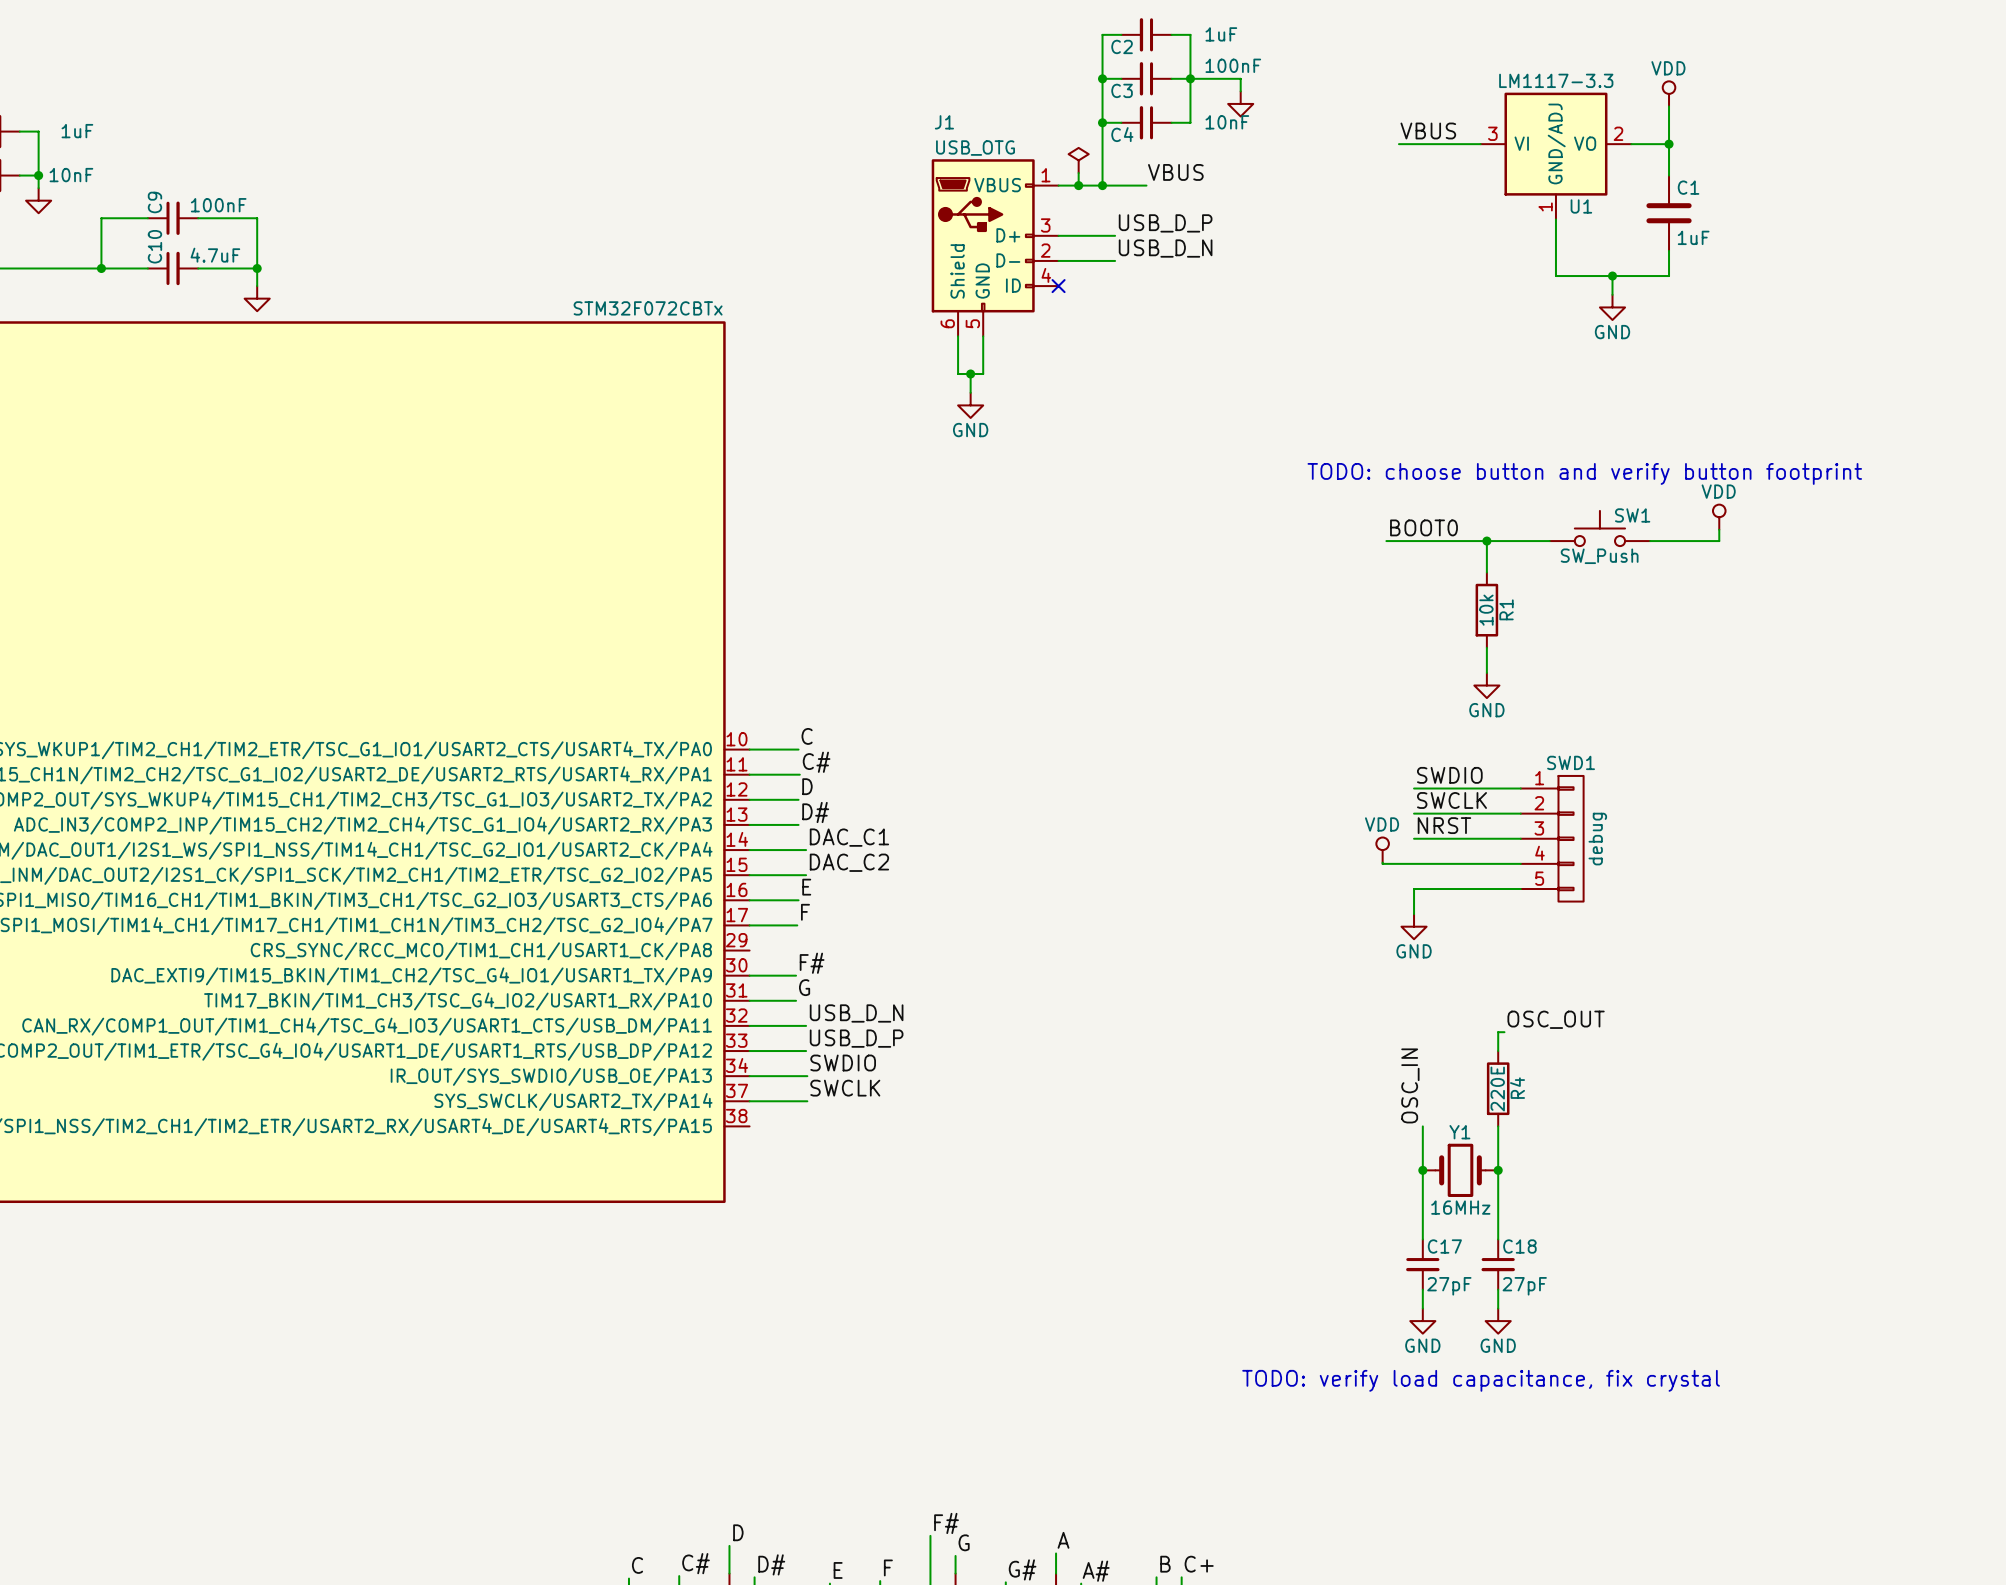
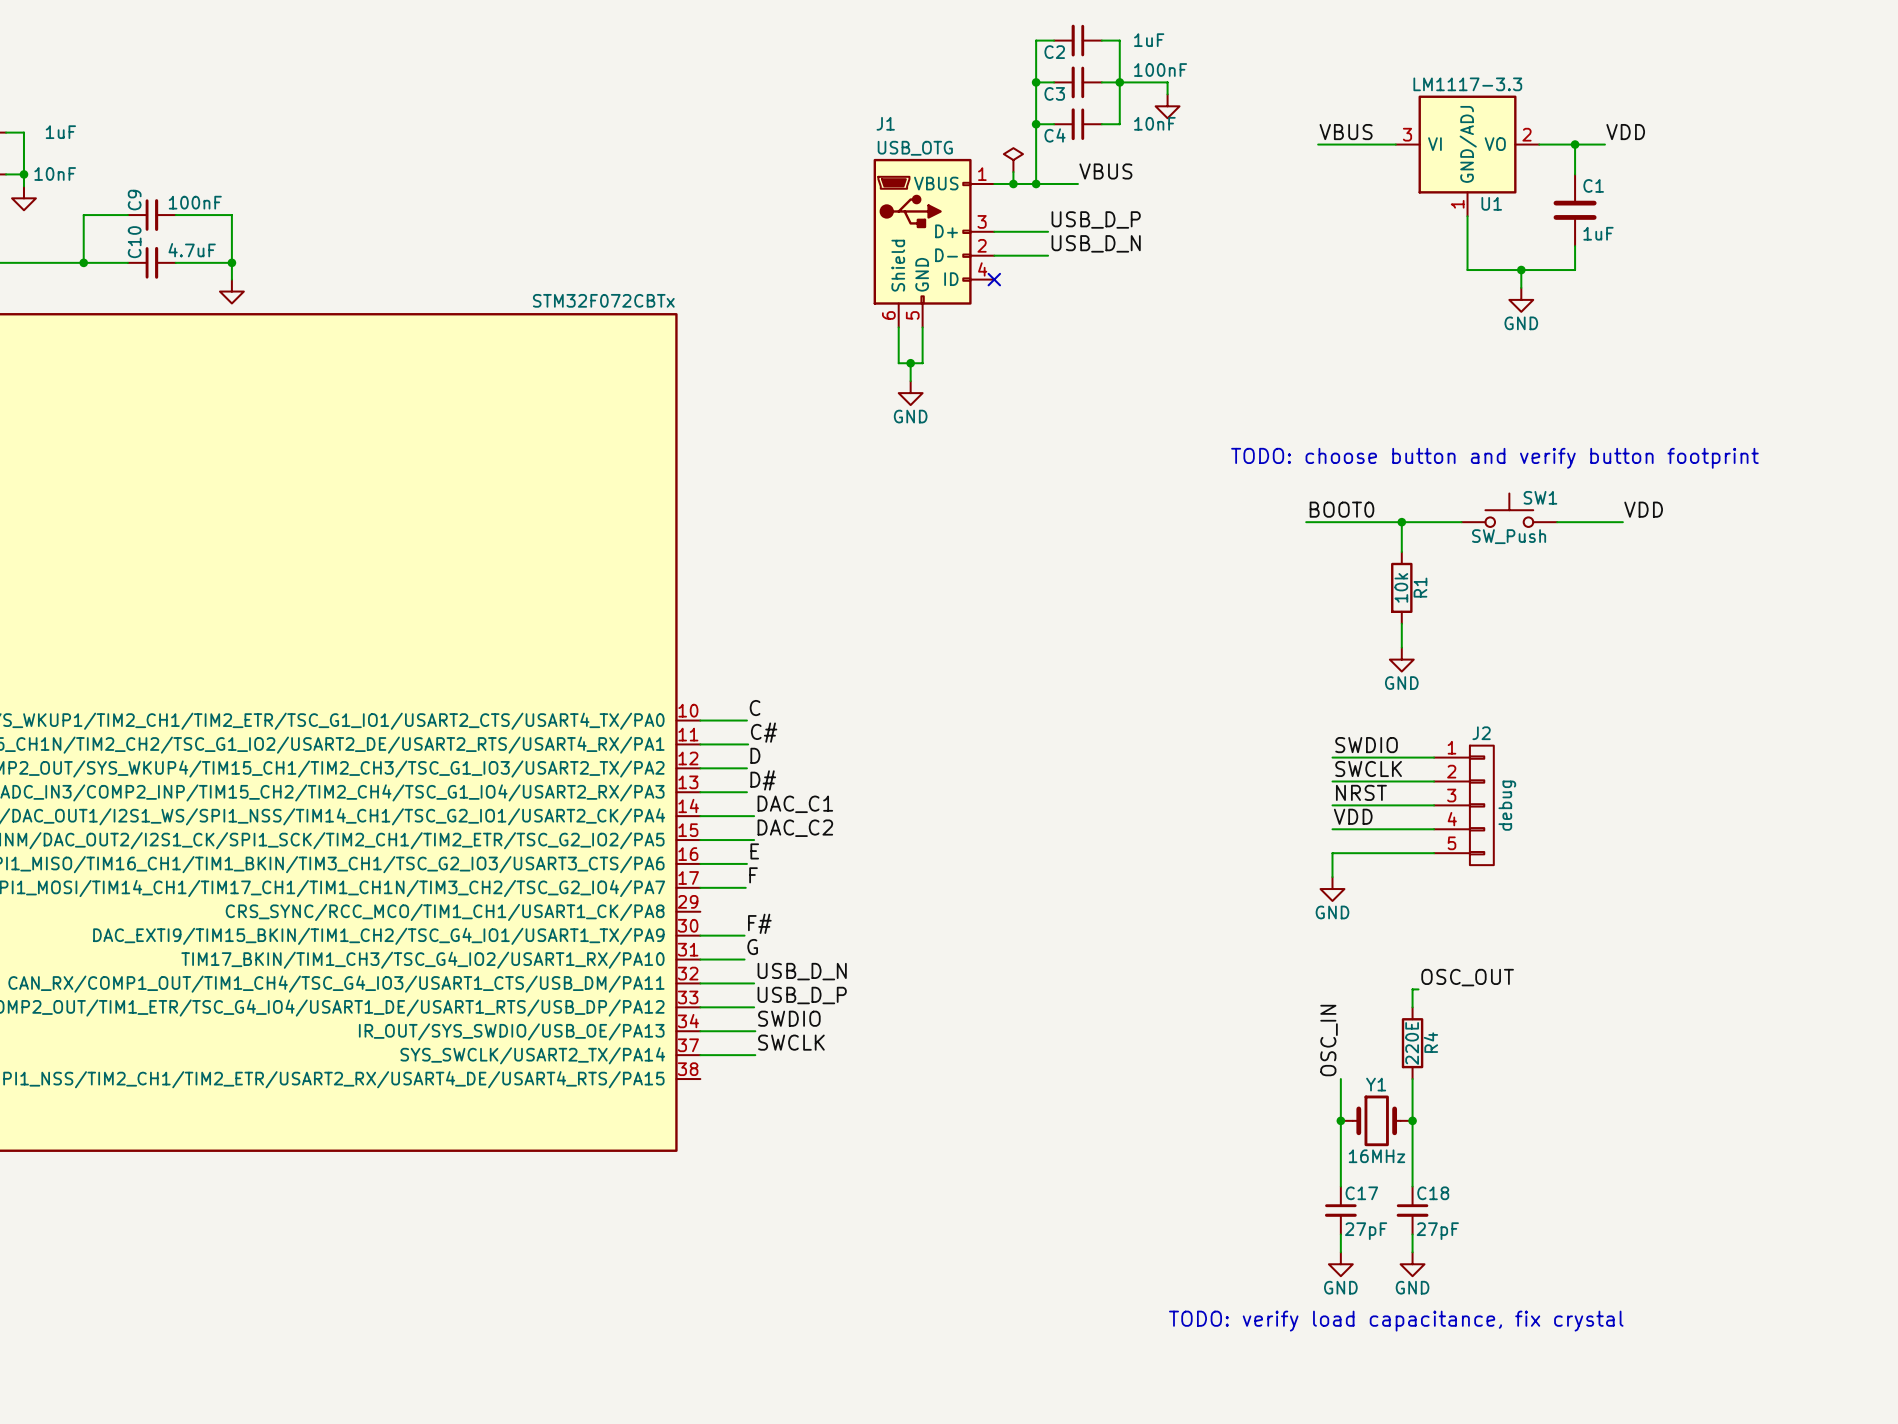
power symbol: VDD (1669, 93) -> none
wire: (1669, 106) (1669, 144) -> (1604, 144) (1575, 144)
label: none -> VDD (1625, 132)
power symbol: VDD (1719, 517) -> none
label: none -> VDD (1643, 509)
wire: (1719, 529) (1719, 541) -> none
SWD1 name: SWD1 (1571, 762) -> J2 (1481, 733)
power symbol: VDD (1382, 850) -> none
label: none -> VDD (1353, 816)
wire: (1382, 862) (1414, 863) -> none

